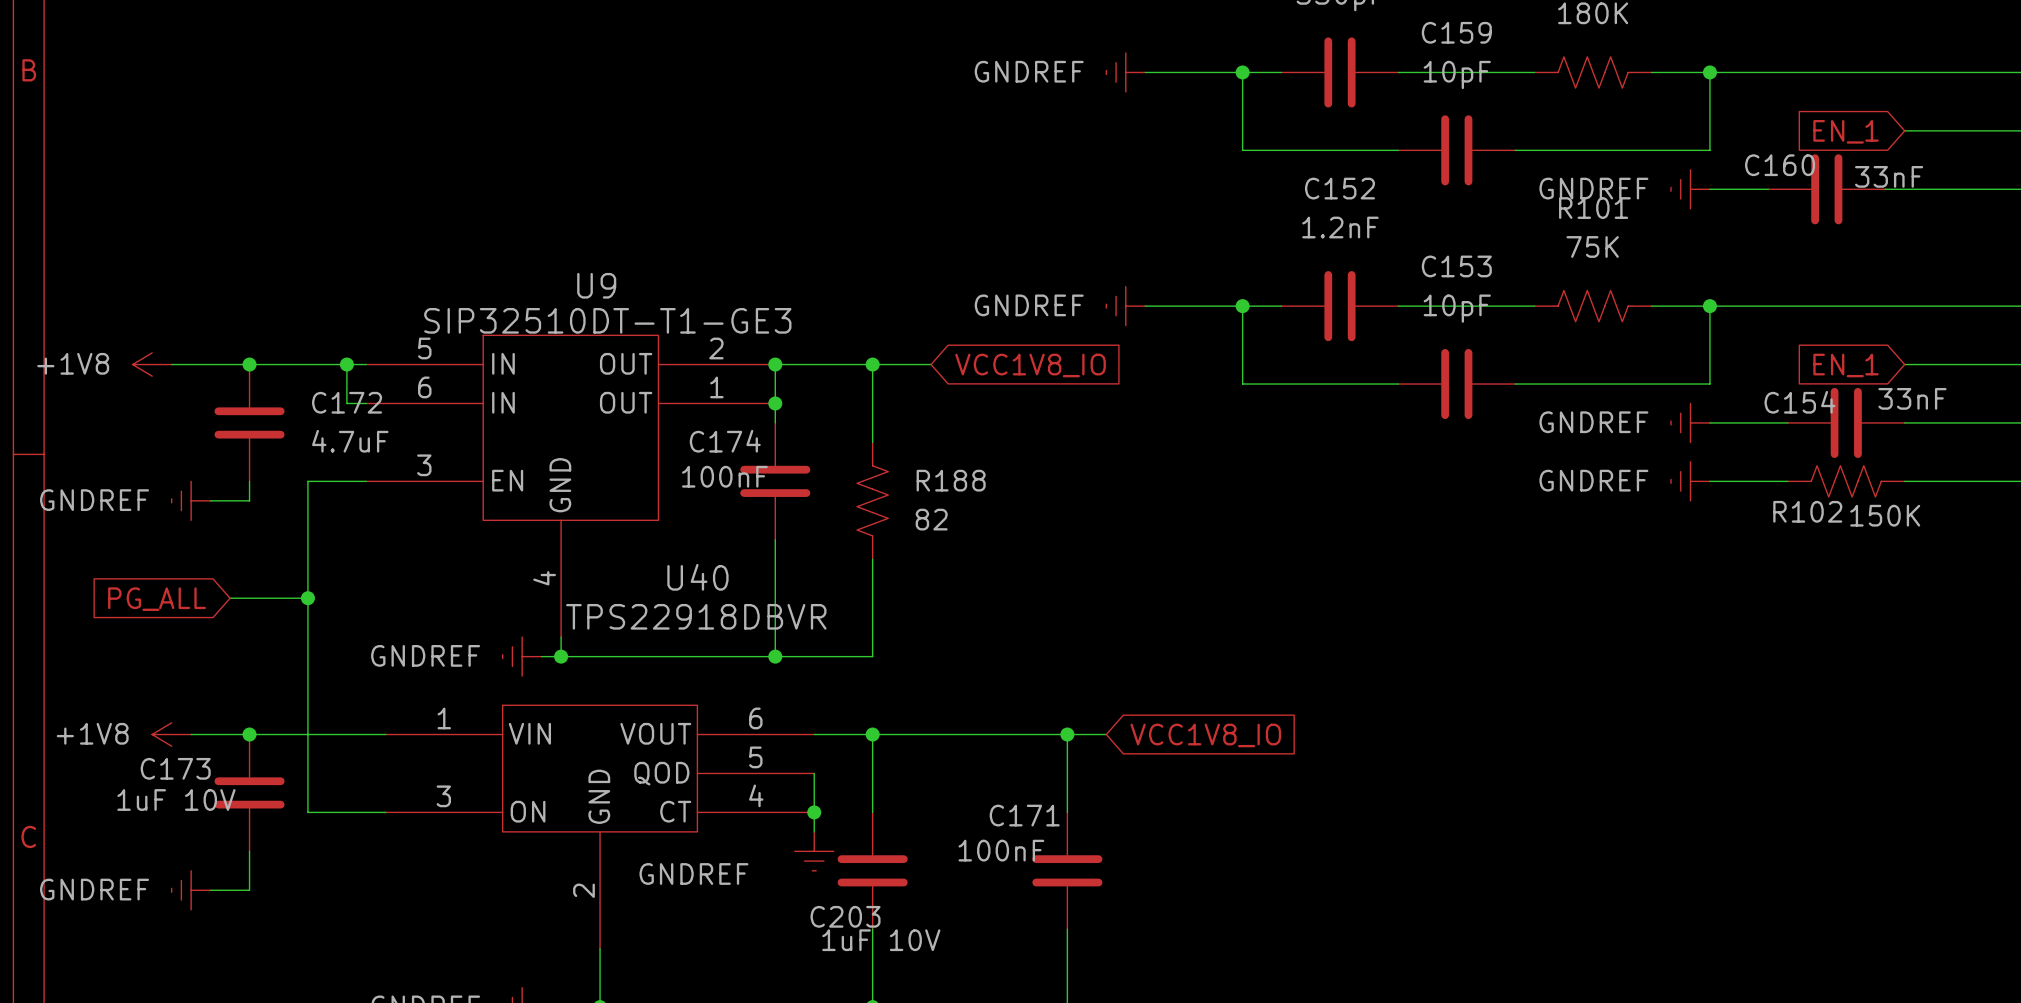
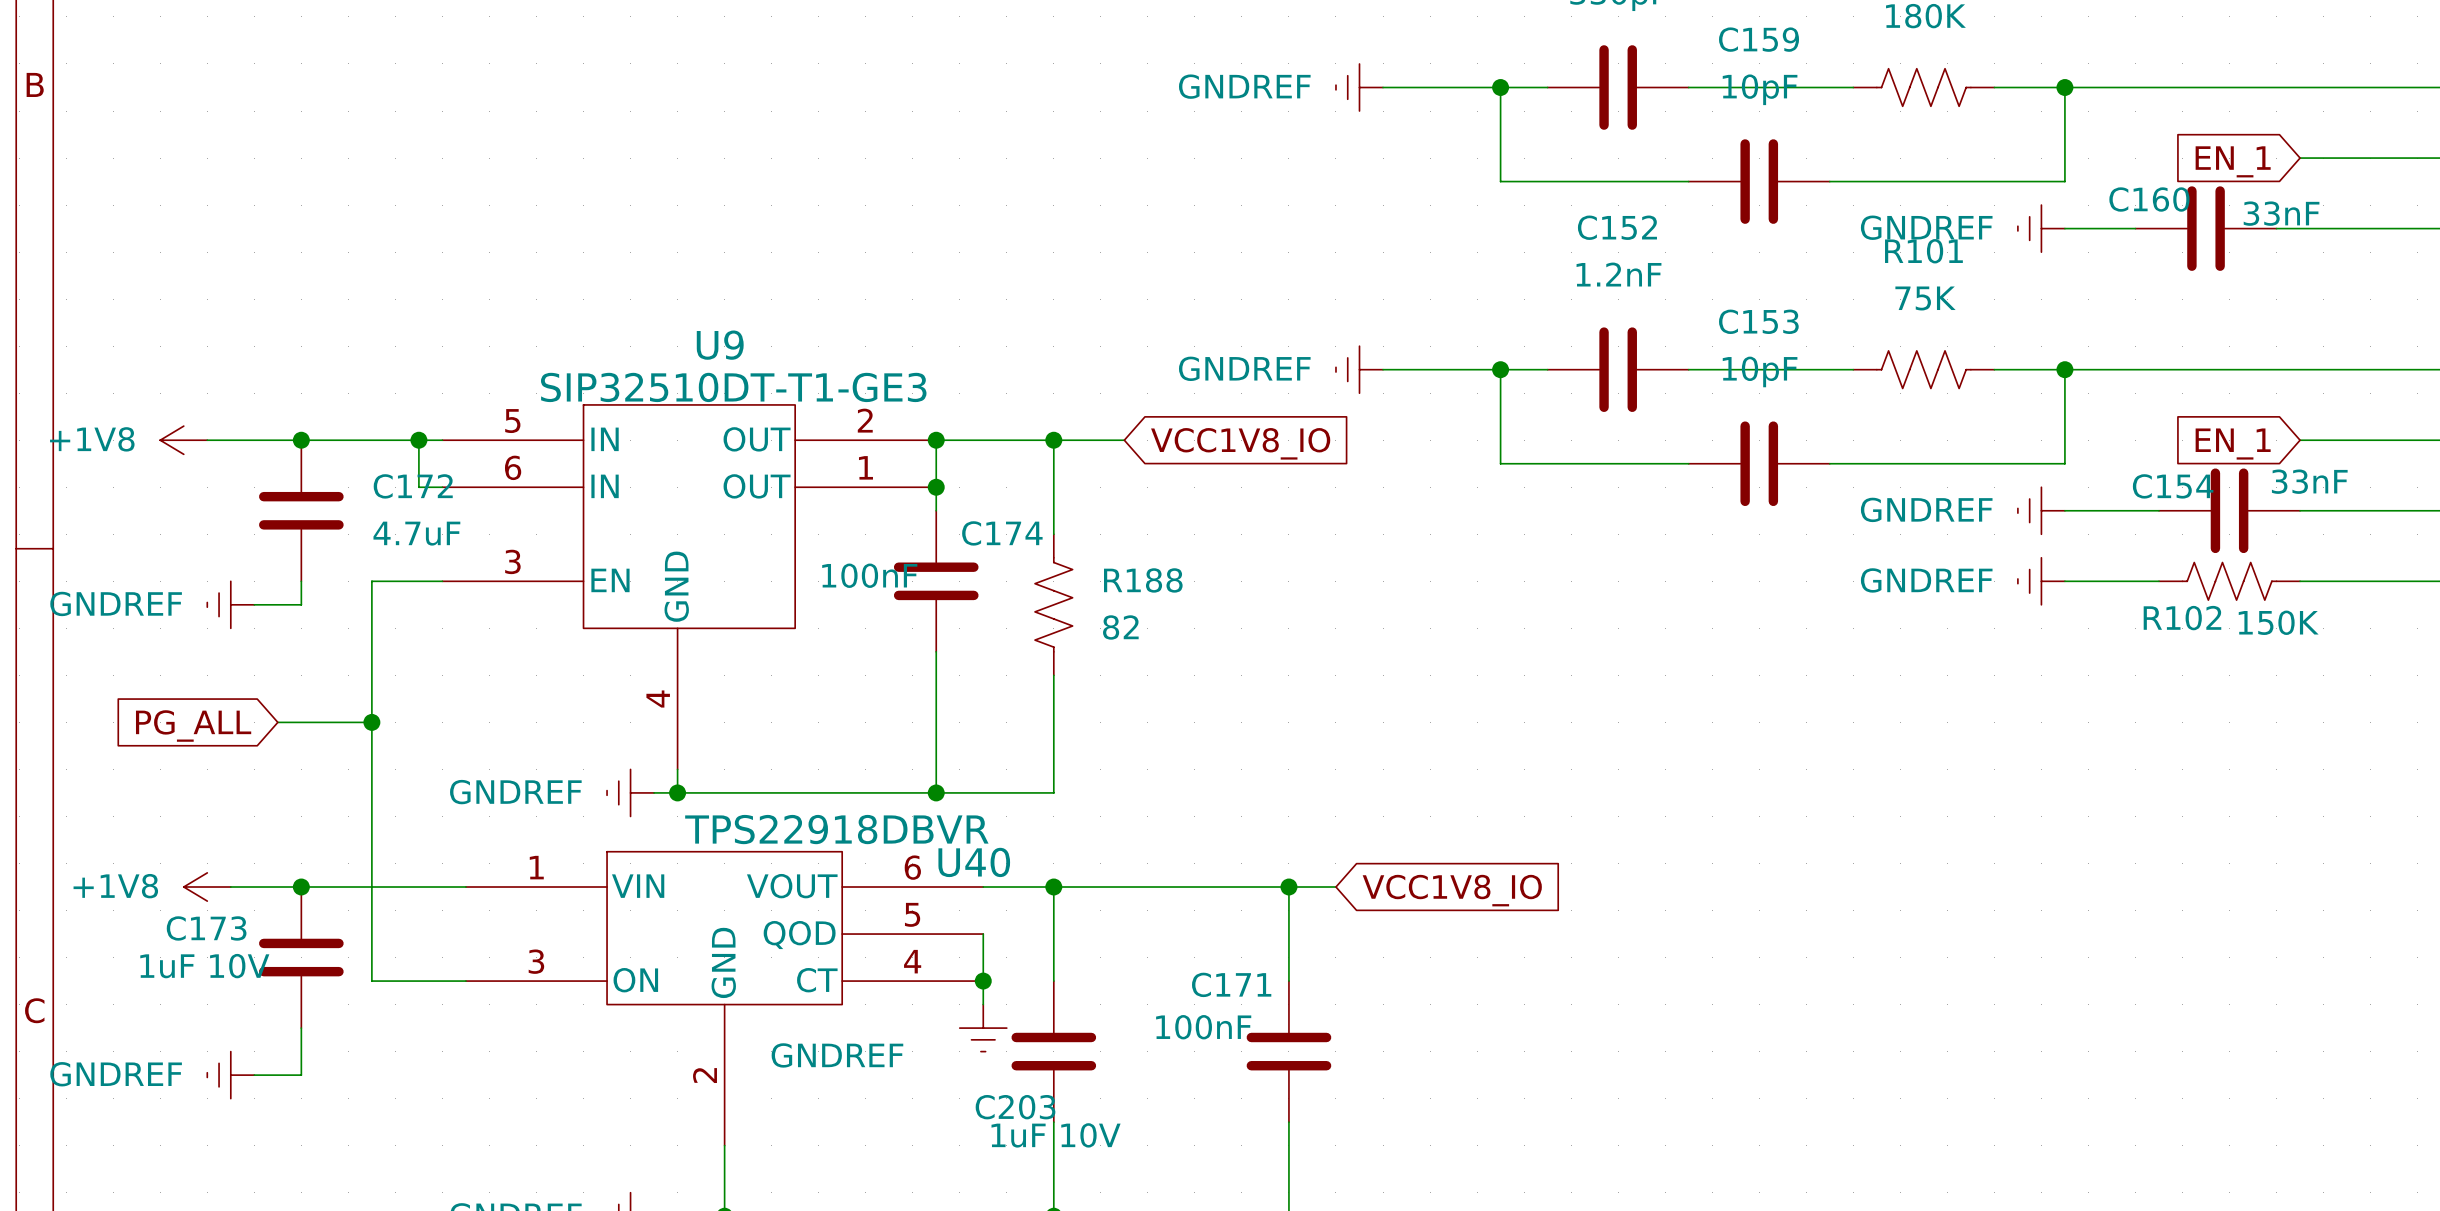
C174 name position: C174 (725, 441) -> C174 (1002, 533)
U40 name position: U40 (697, 577) -> U40 (974, 862)
U40 value position: TPS22918DBVR (696, 616) -> TPS22918DBVR (836, 829)

